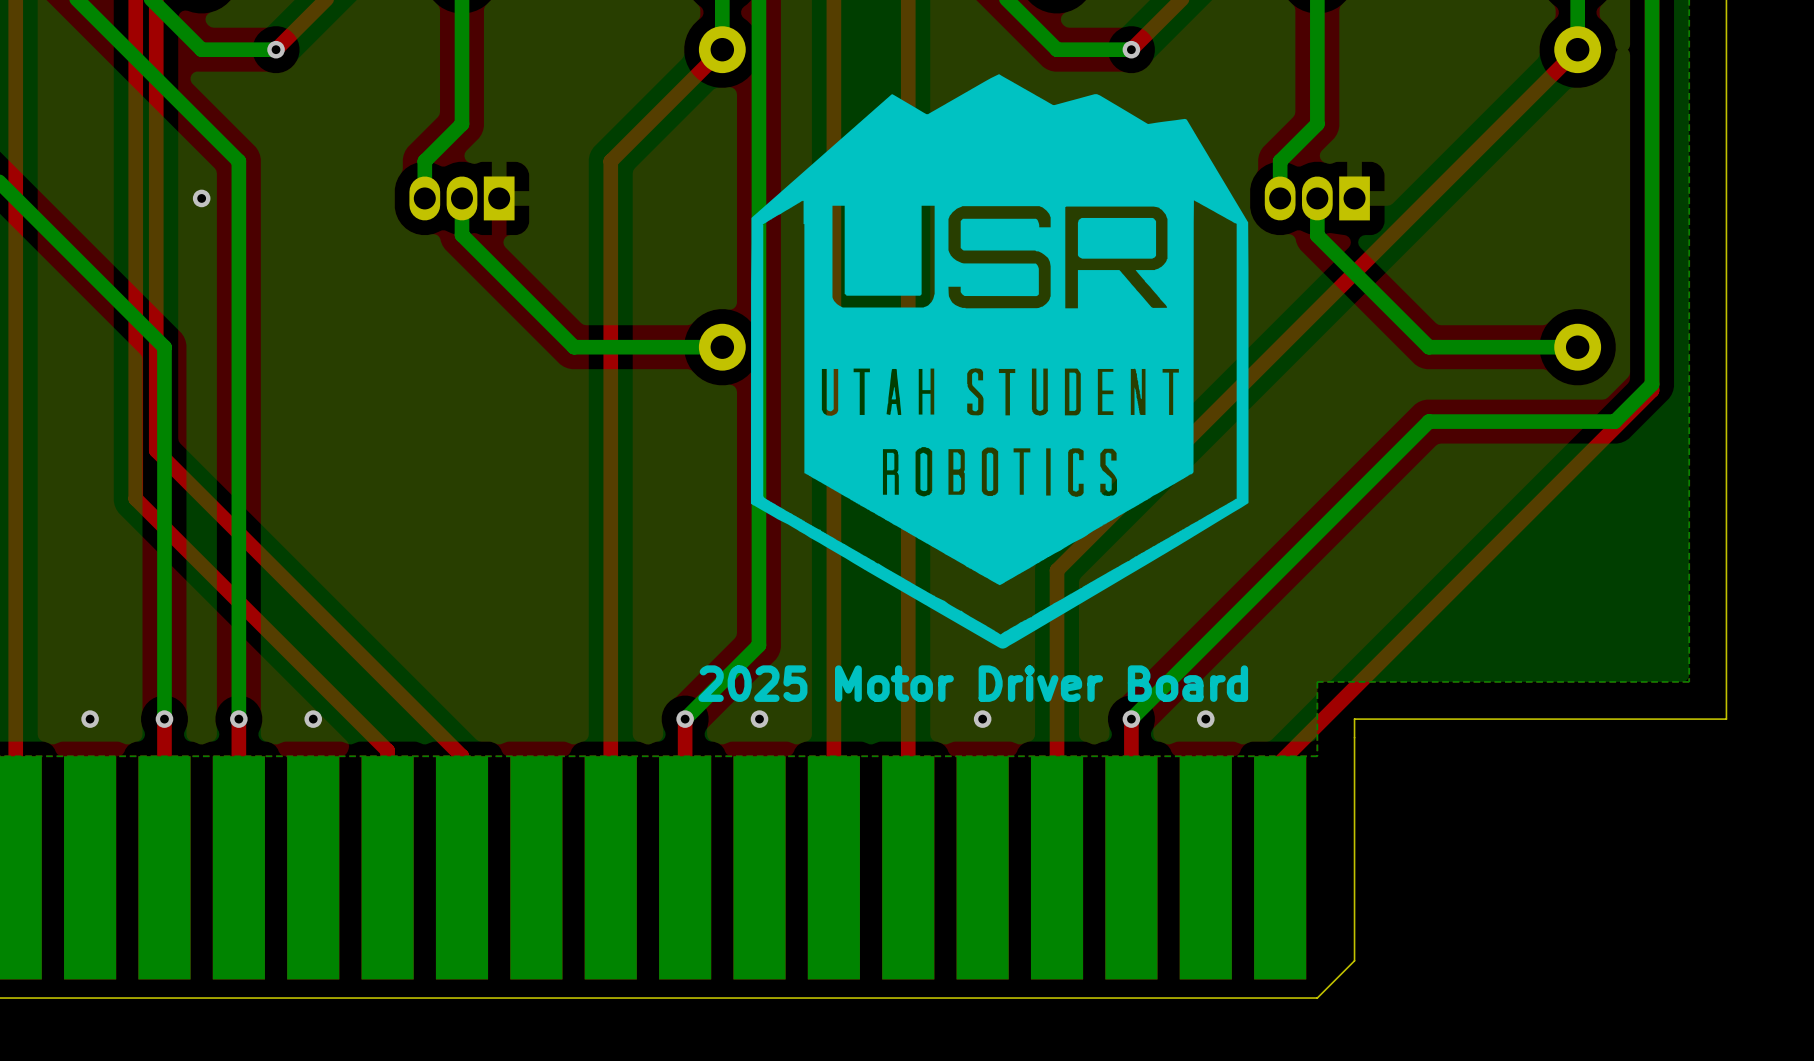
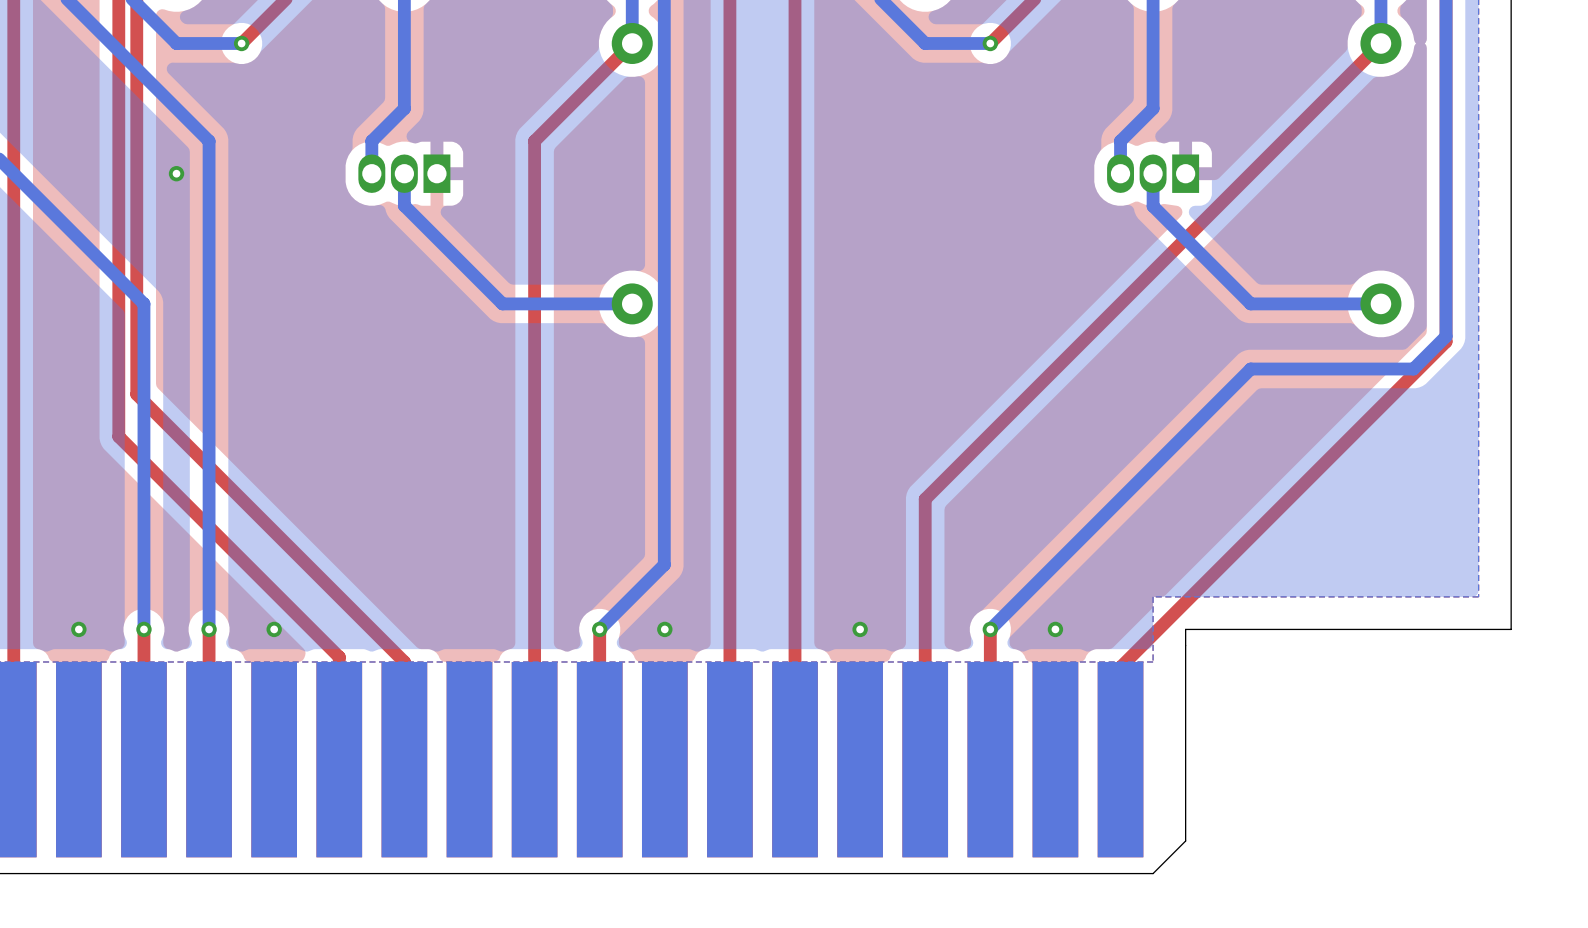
drawing: [750, 74, 1249, 649] -> none
text: 2025 Motor Driver Board (973, 683) -> none

